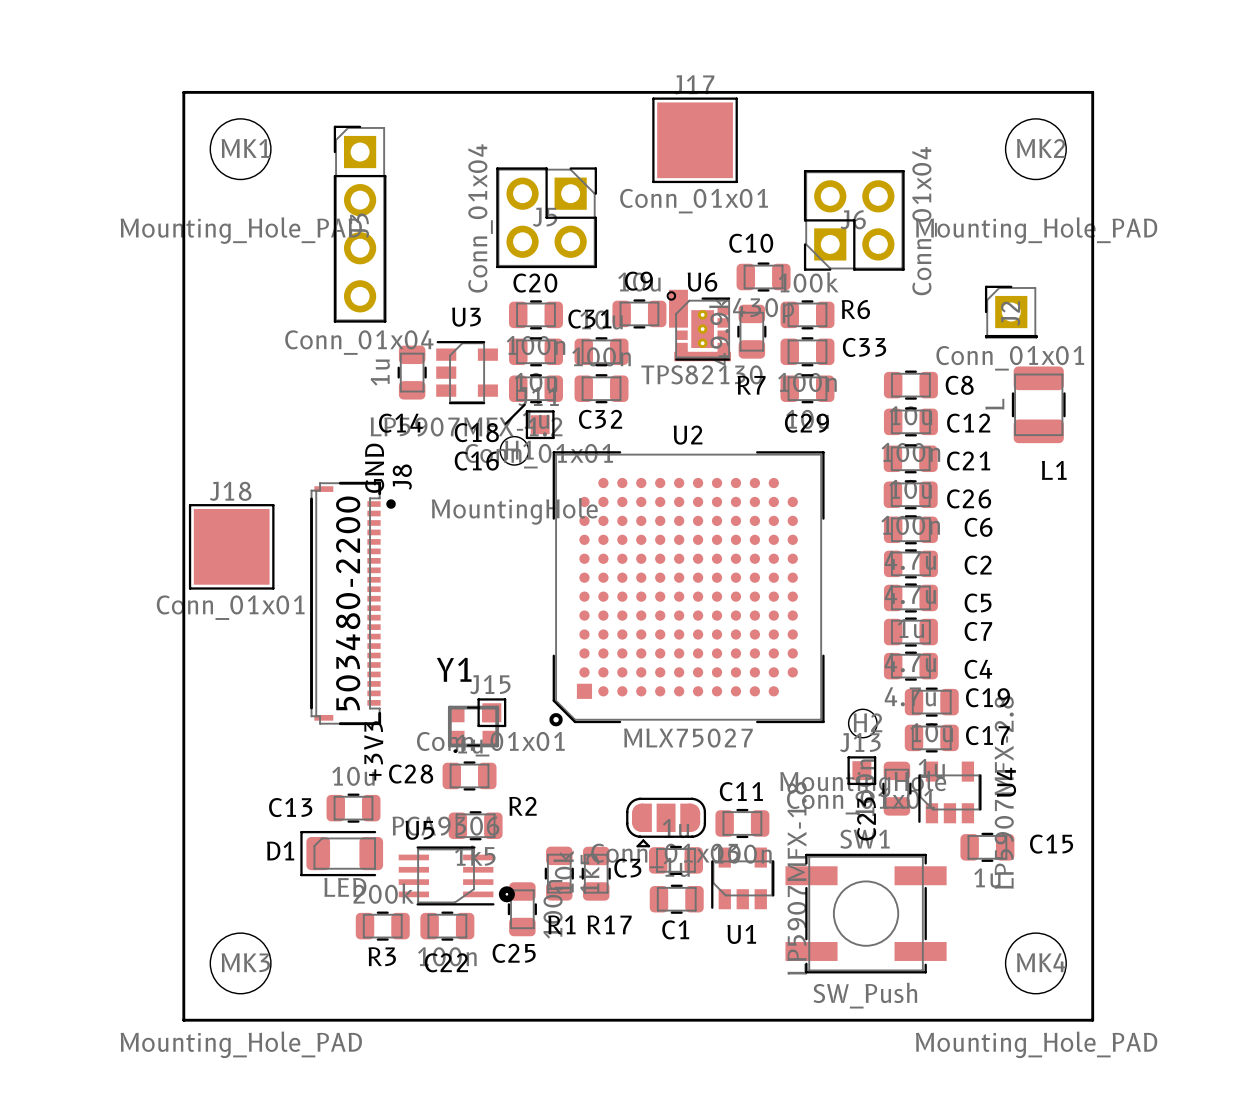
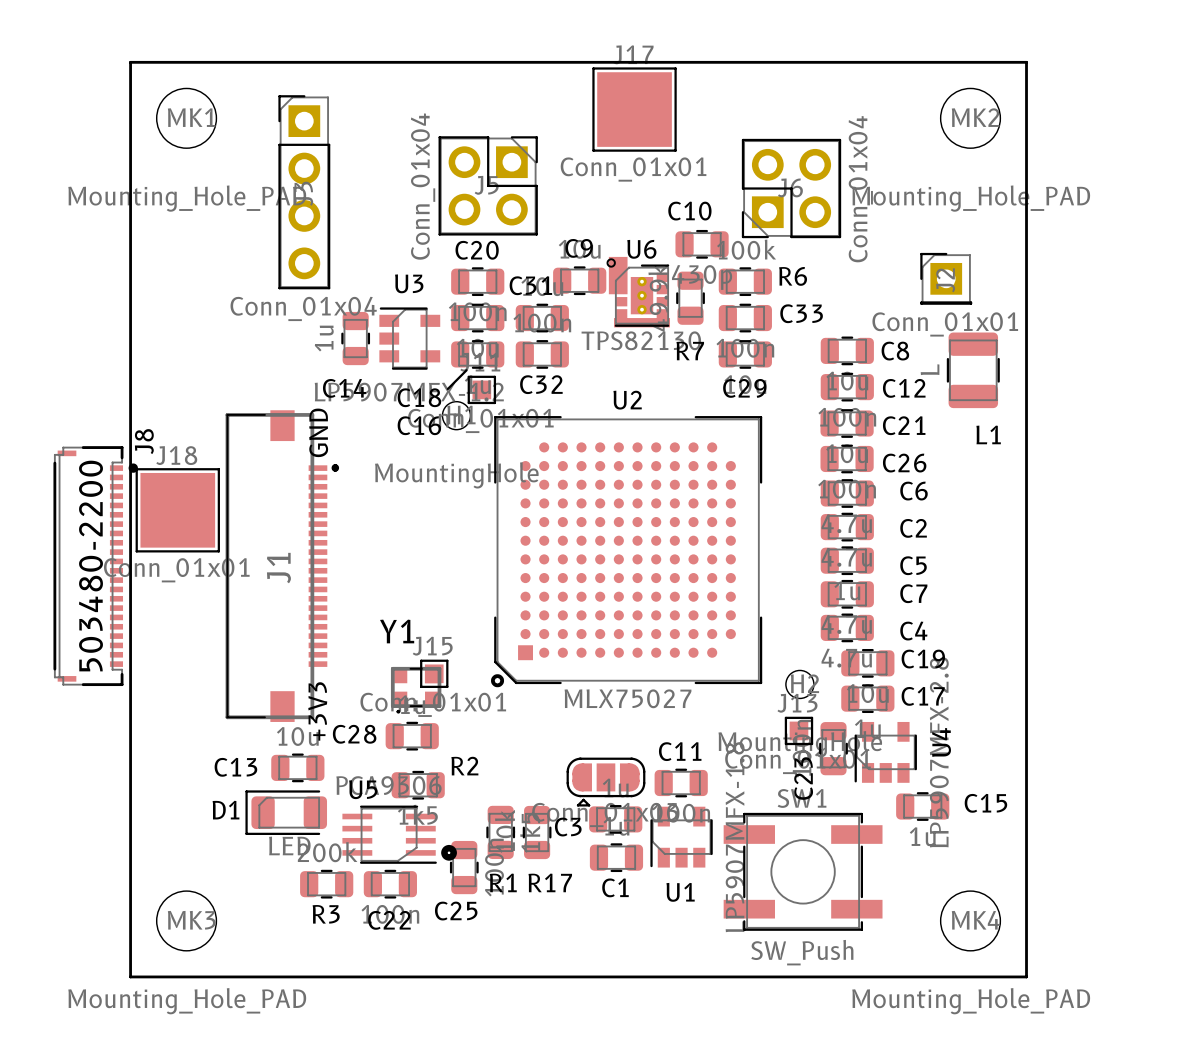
J1: none -> (282, 566)
J8 position: (352, 603) -> (95, 566)

